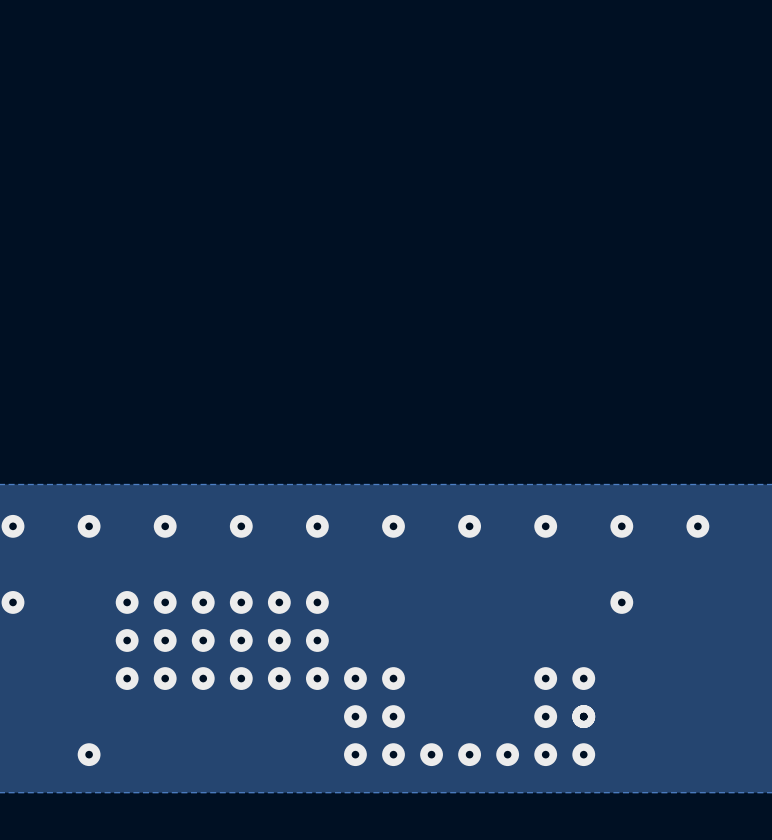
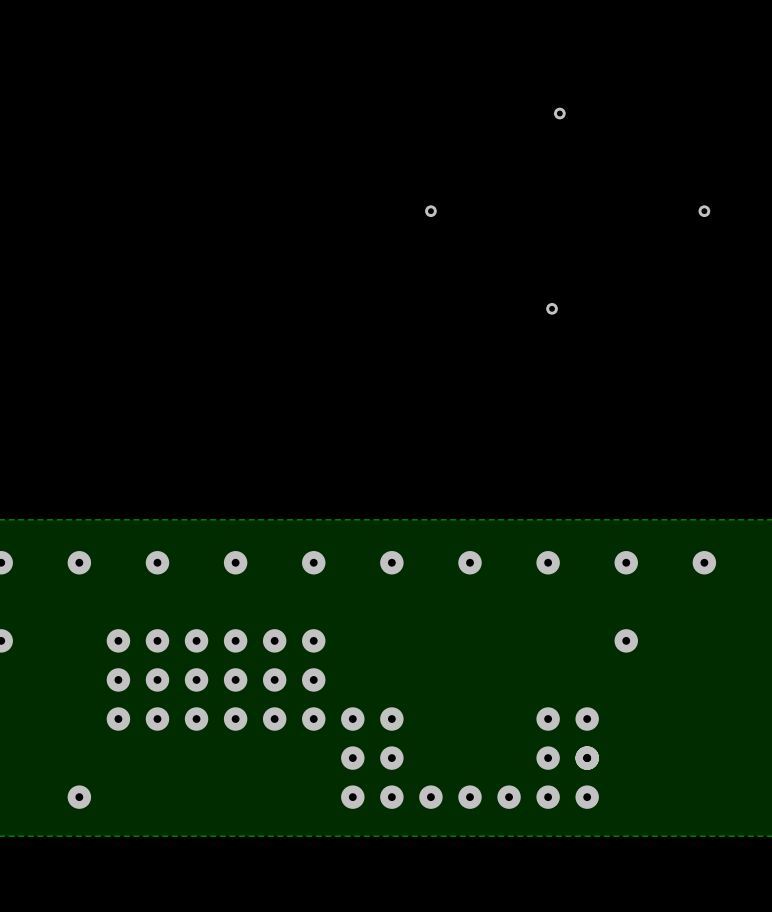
via: none -> (559, 113)
via: none -> (430, 211)
via: none -> (704, 211)
via: none -> (552, 308)

